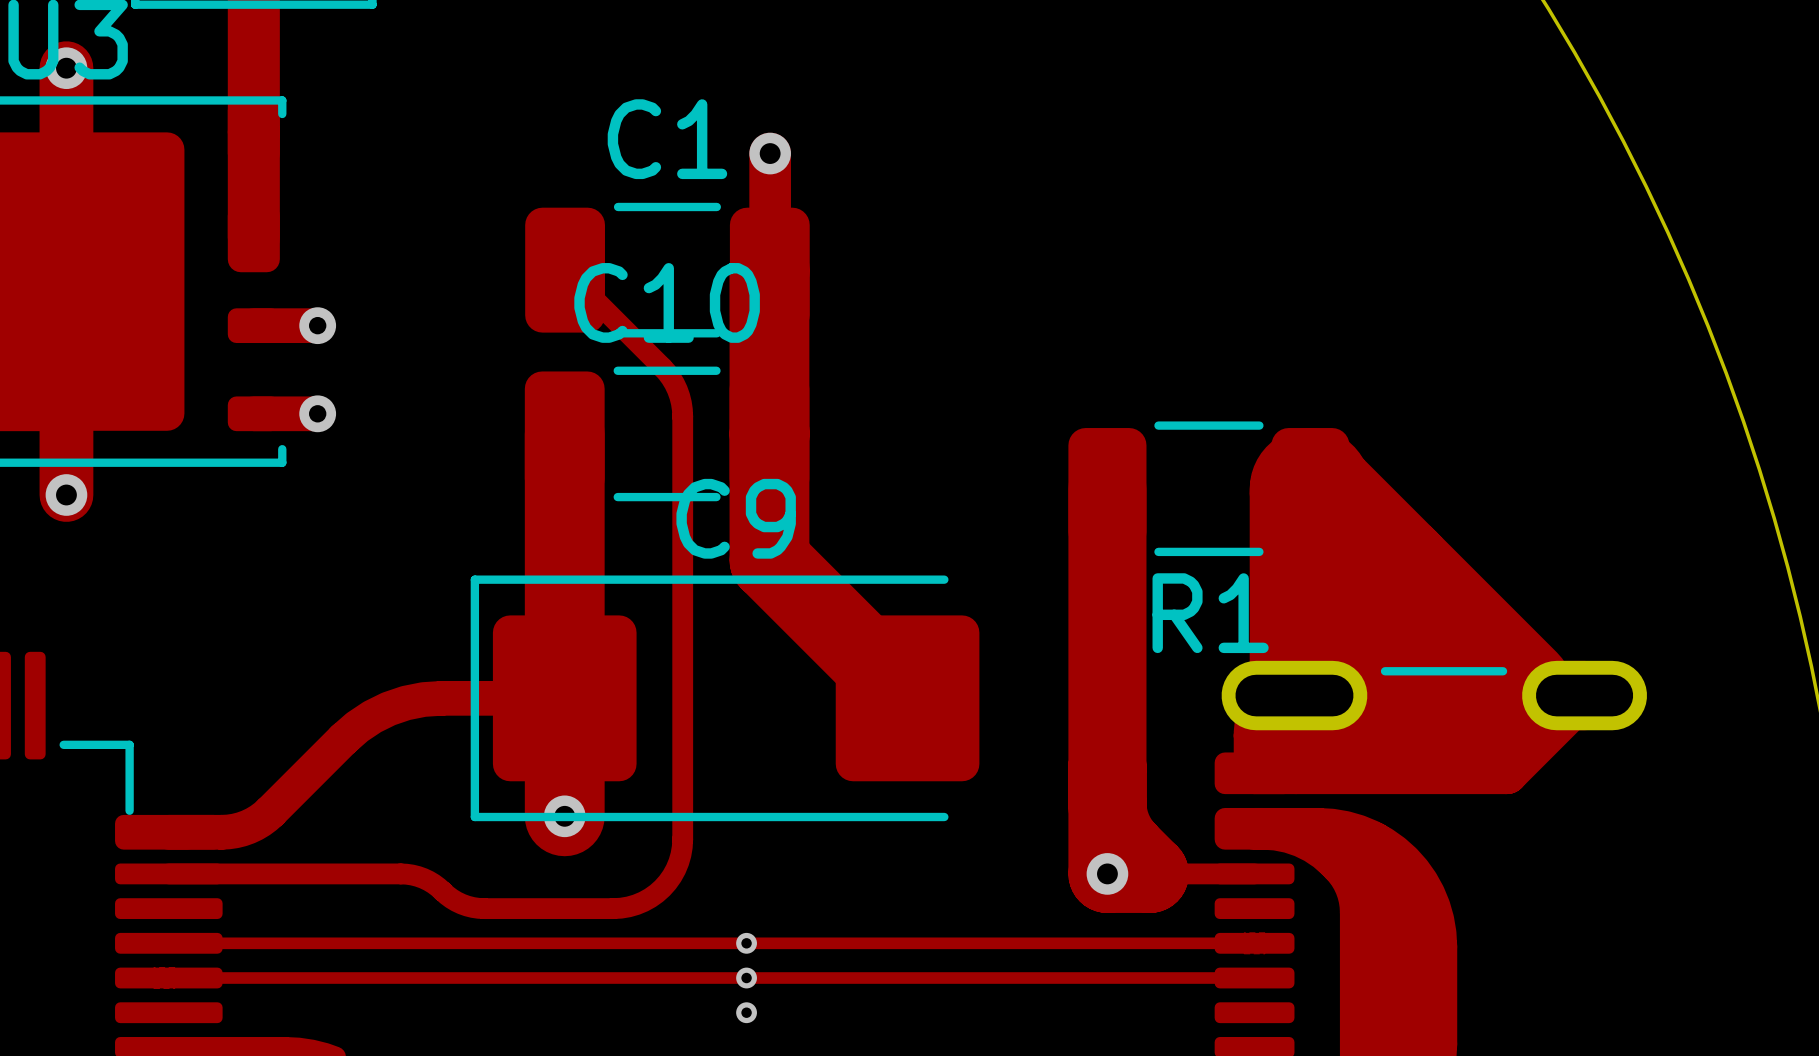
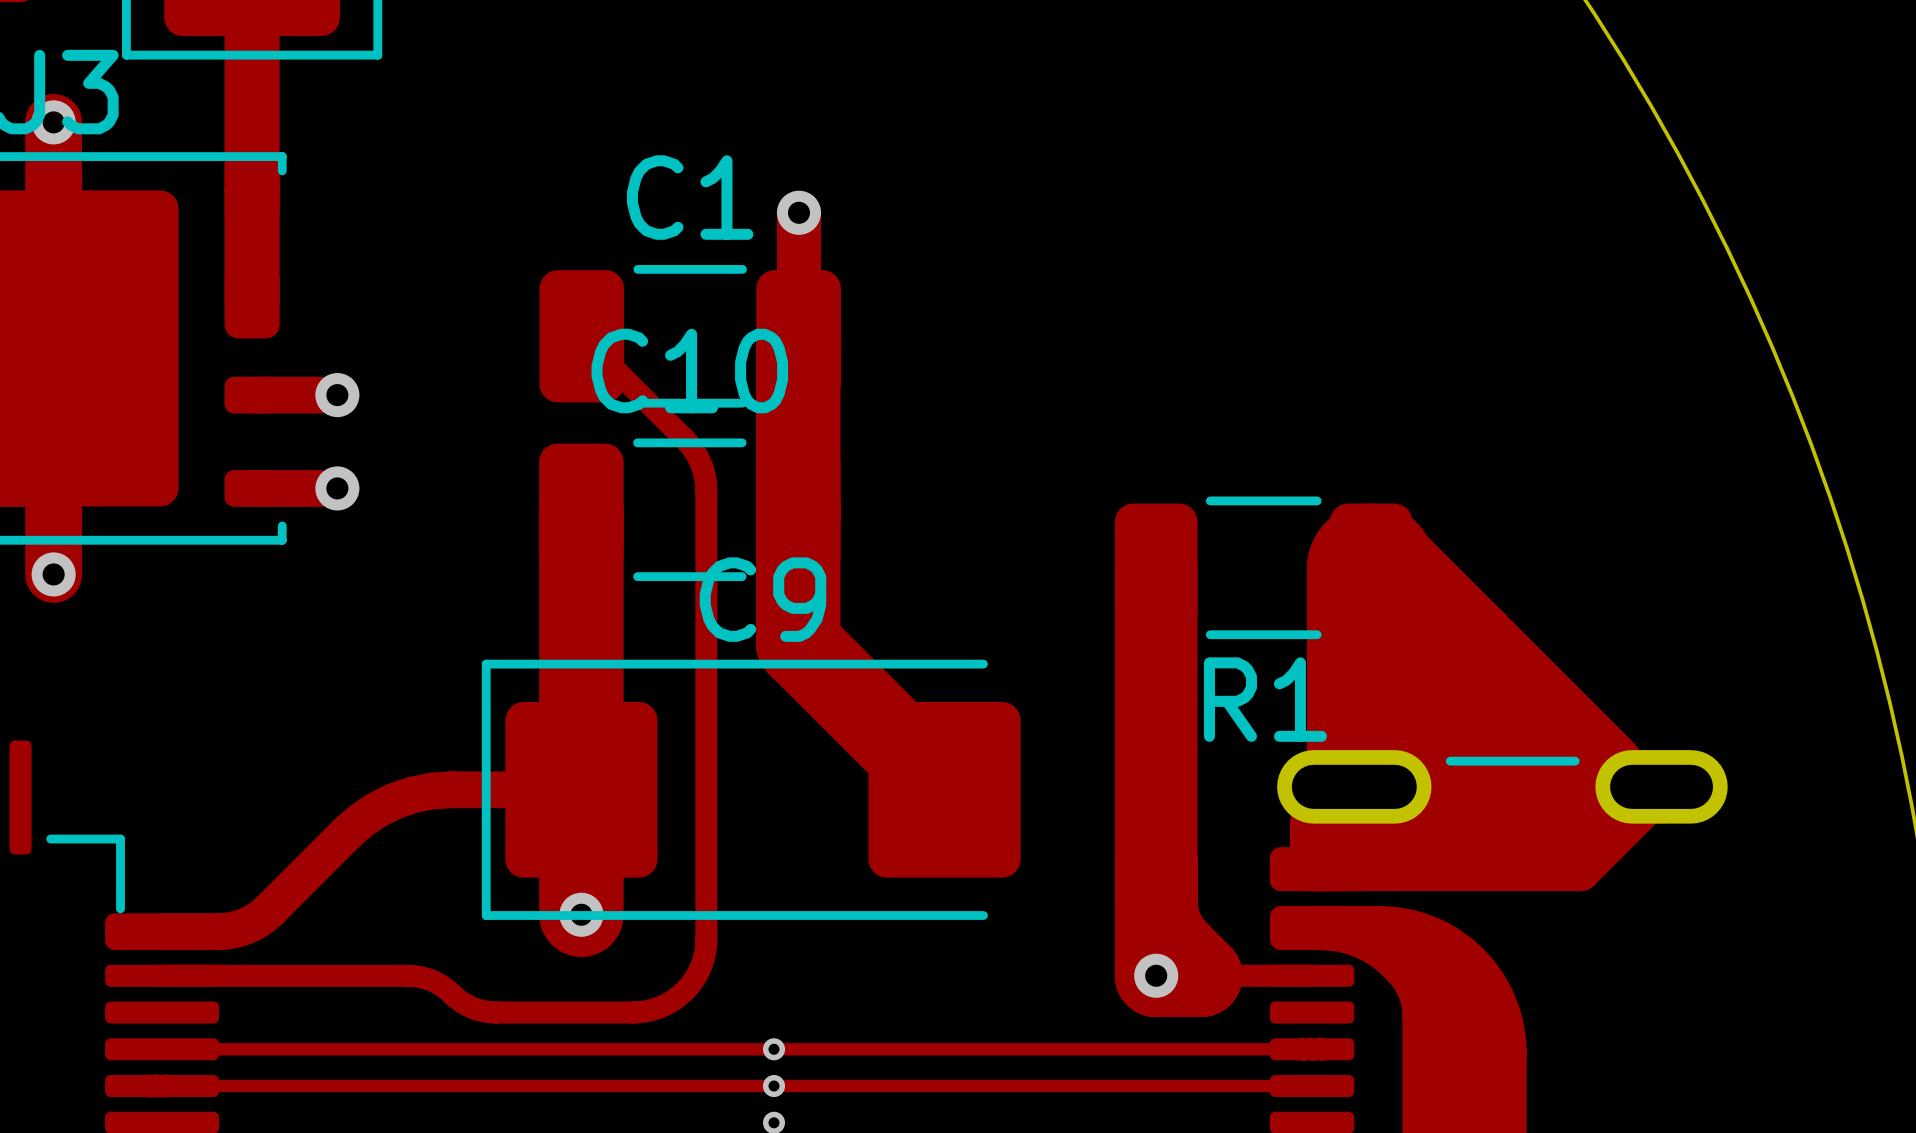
via position: (317, 325) -> (337, 395)
via position: (317, 413) -> (337, 488)

